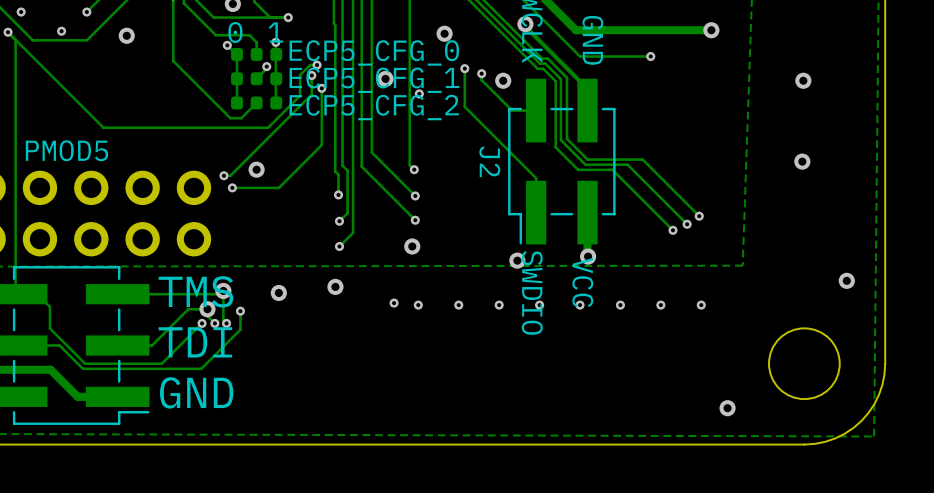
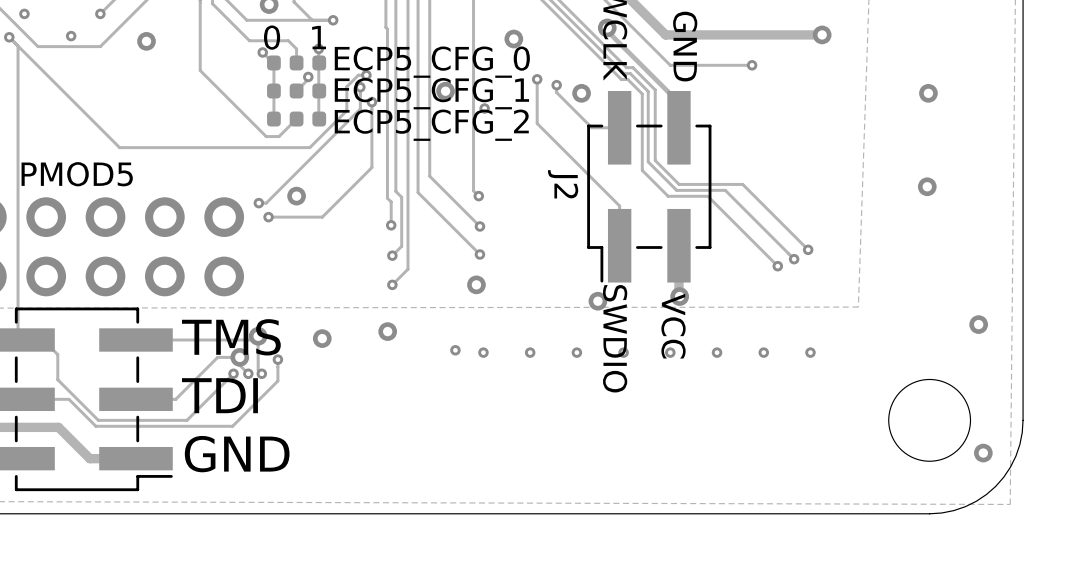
via: none -> (983, 453)
via: (727, 408) -> none

